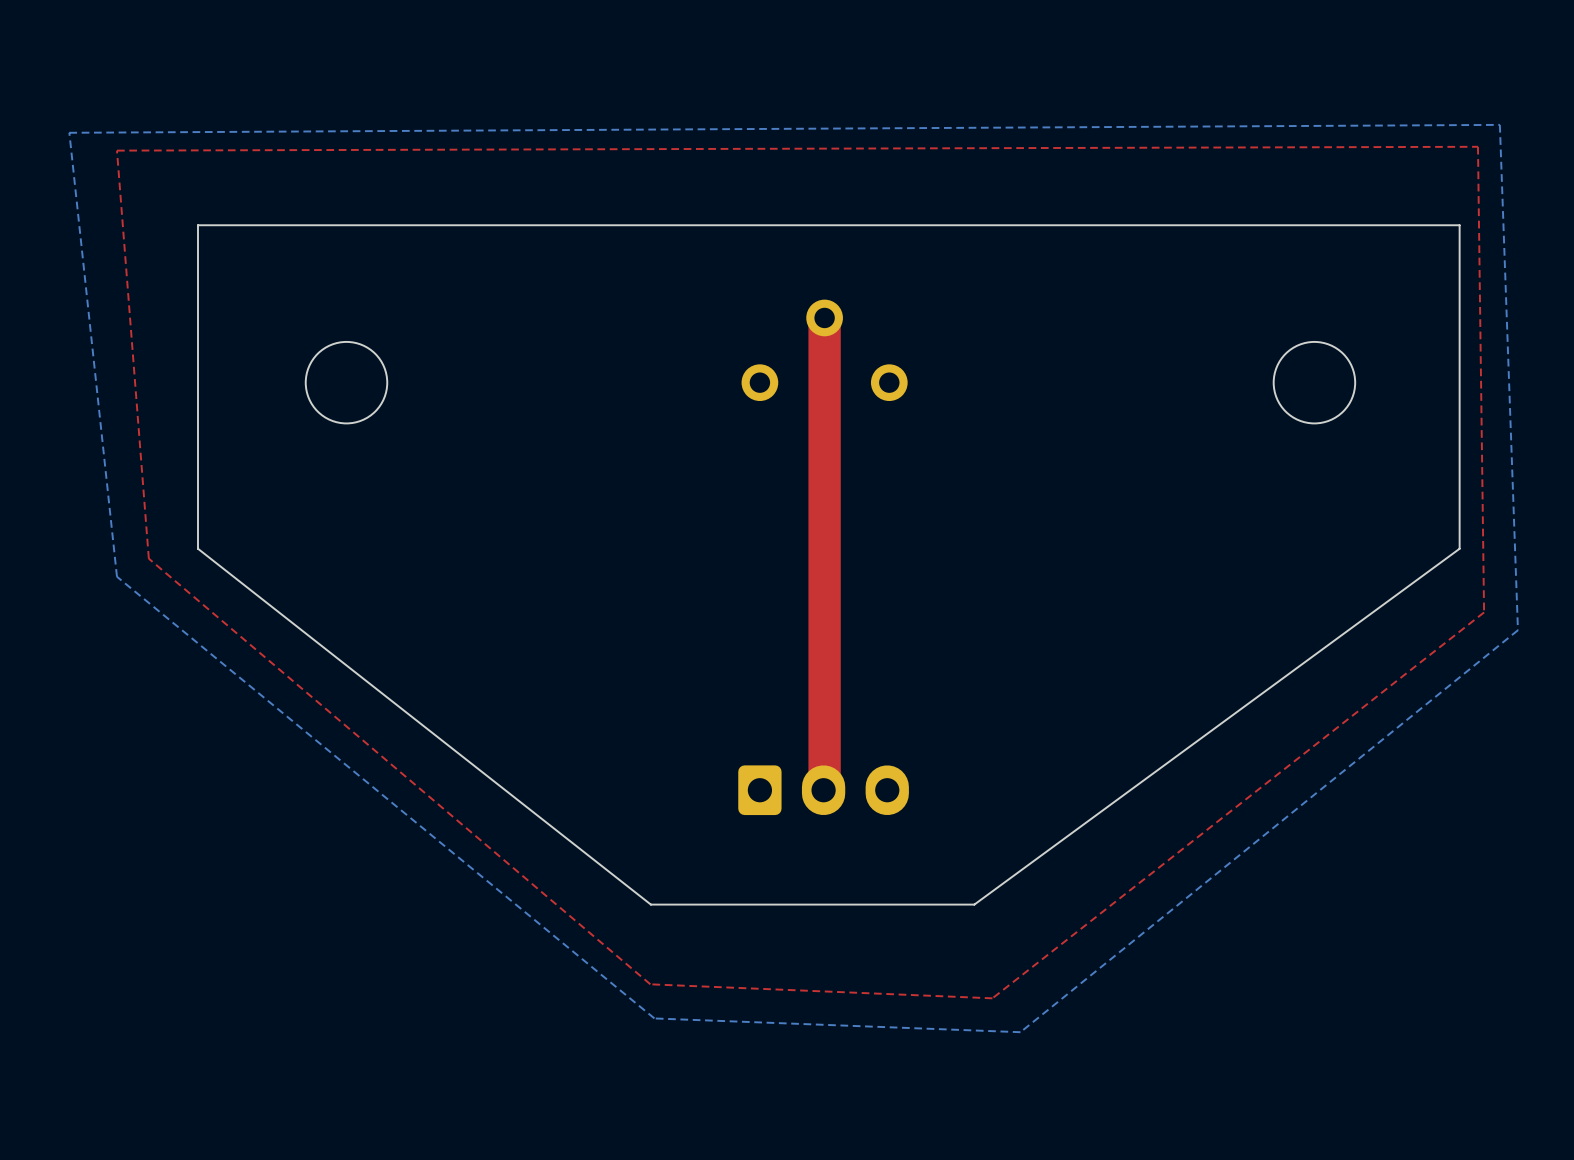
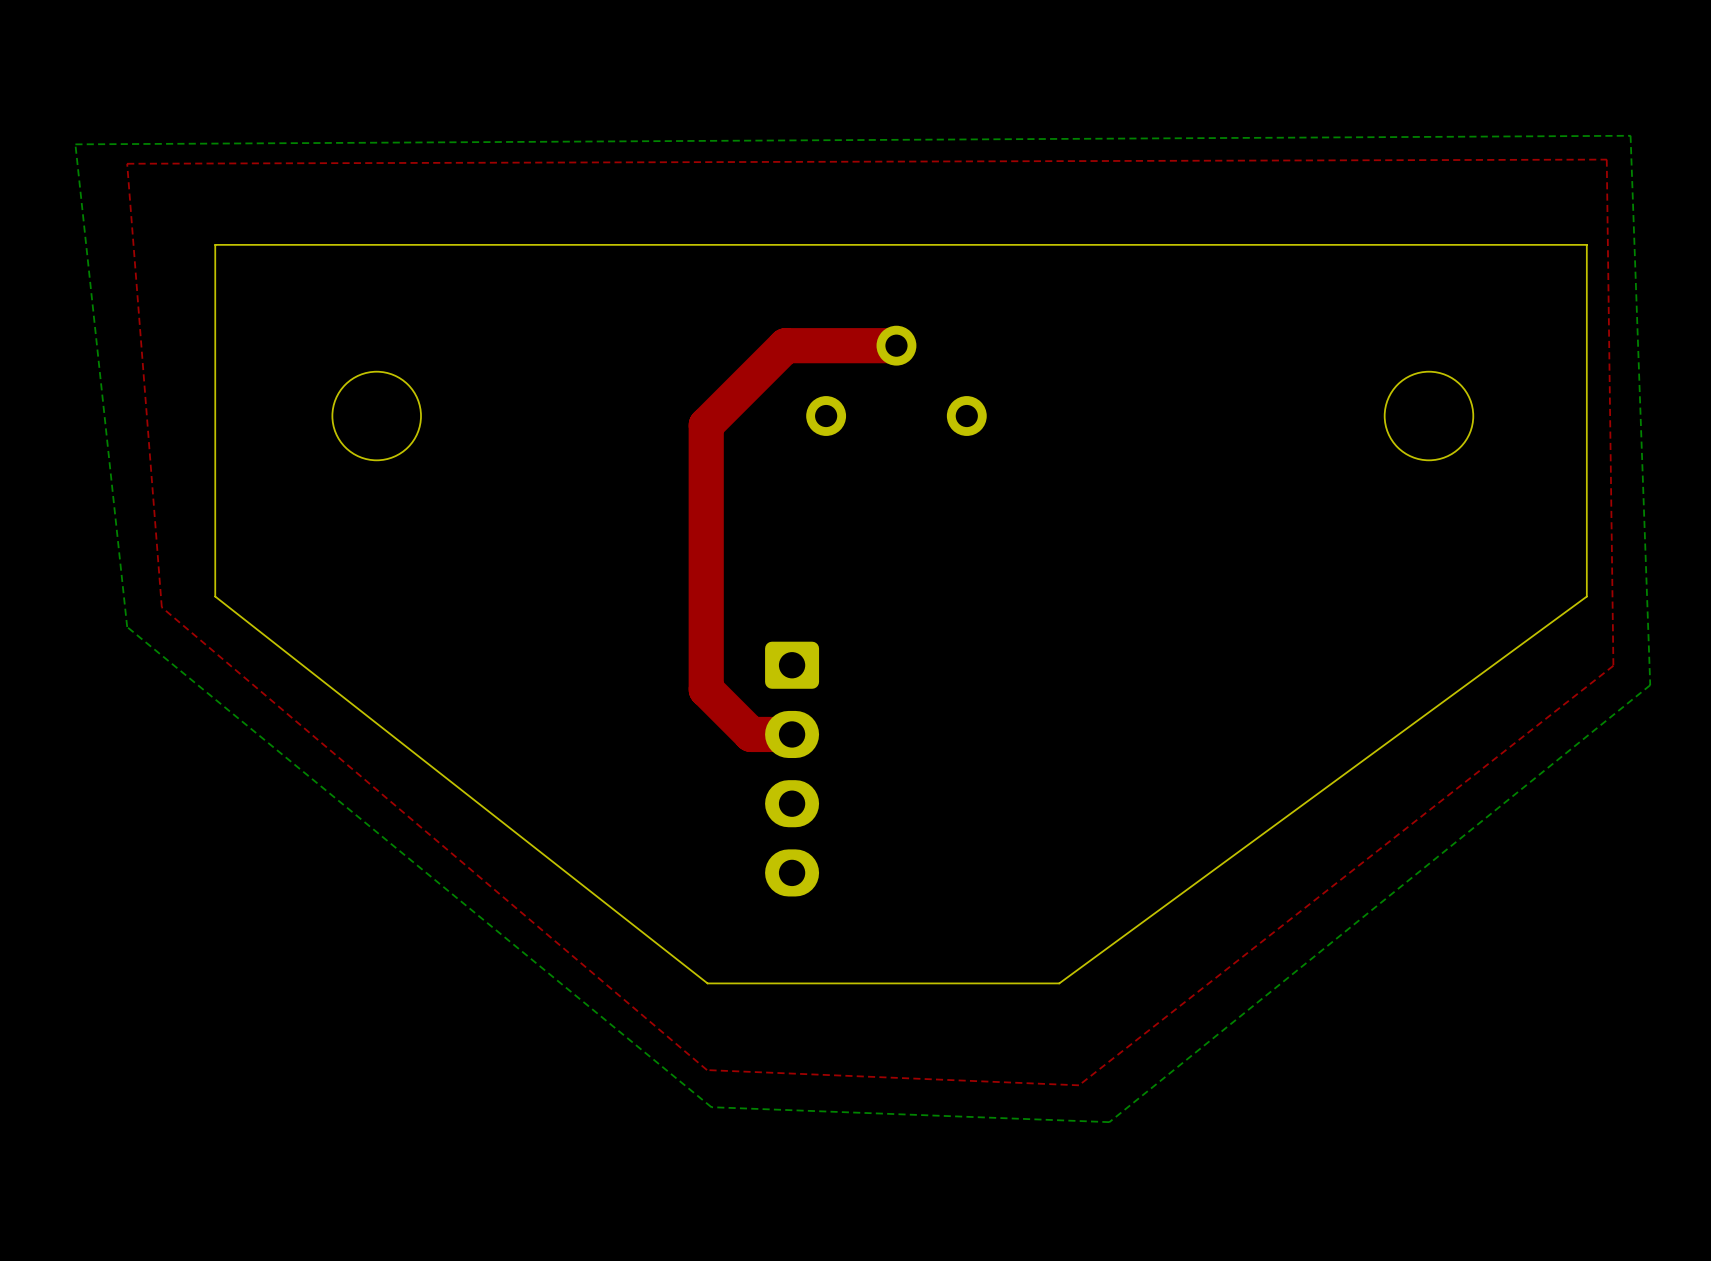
top track: (824, 317) (823, 790) -> (896, 345) (785, 345) (706, 425) (706, 689) (751, 734) (792, 734)
part: none -> (792, 769)
part: (823, 790) -> none

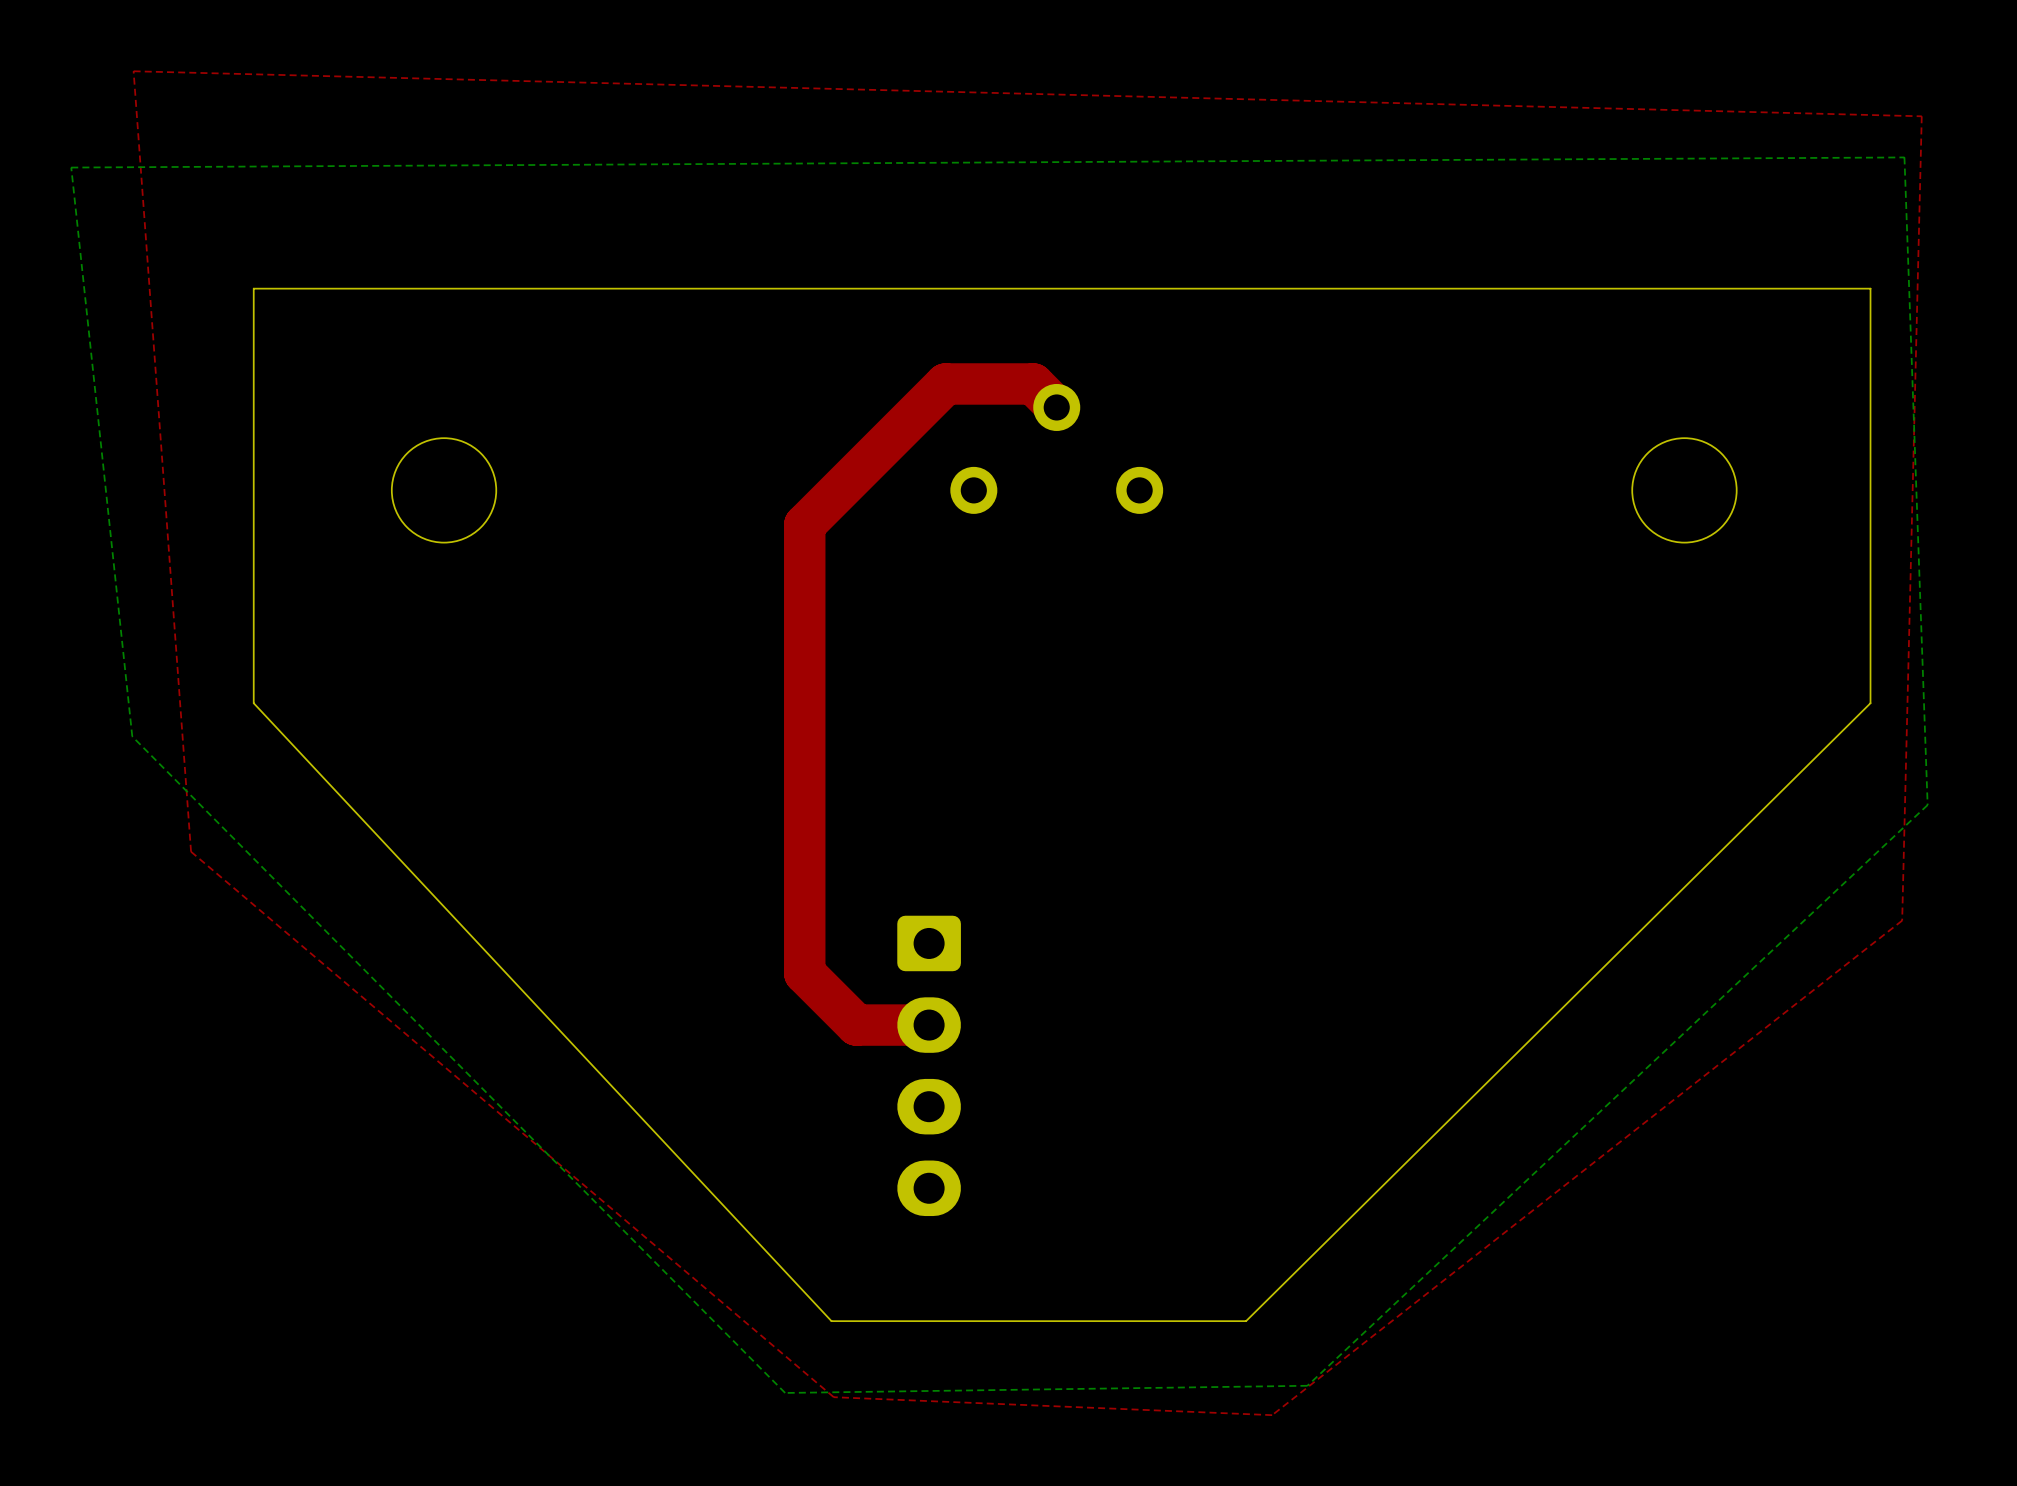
bottom zone outline: (1630, 135) (75, 144) (127, 627) (711, 1107) (1109, 1122) (1650, 685) (1630, 135) -> (1904, 157) (1927, 805) (1307, 1385) (785, 1392) (132, 736) (71, 167) (1904, 157)
top zone outline: (1606, 159) (127, 163) (161, 607) (707, 1070) (1078, 1085) (1613, 665) (1606, 159) -> (133, 71) (1921, 116) (1902, 920) (1272, 1415) (833, 1397) (191, 851) (133, 71)
top track: (896, 345) (785, 345) (706, 425) (706, 689) (751, 734) (792, 734) -> (1056, 407) (1033, 383) (945, 383) (804, 524) (804, 973) (856, 1025) (929, 1025)
board edge: (1586, 596) (1059, 983) (707, 983) (215, 596) -> (1870, 703) (1246, 1321) (831, 1321) (253, 703)
part position: (792, 769) -> (929, 1065)

